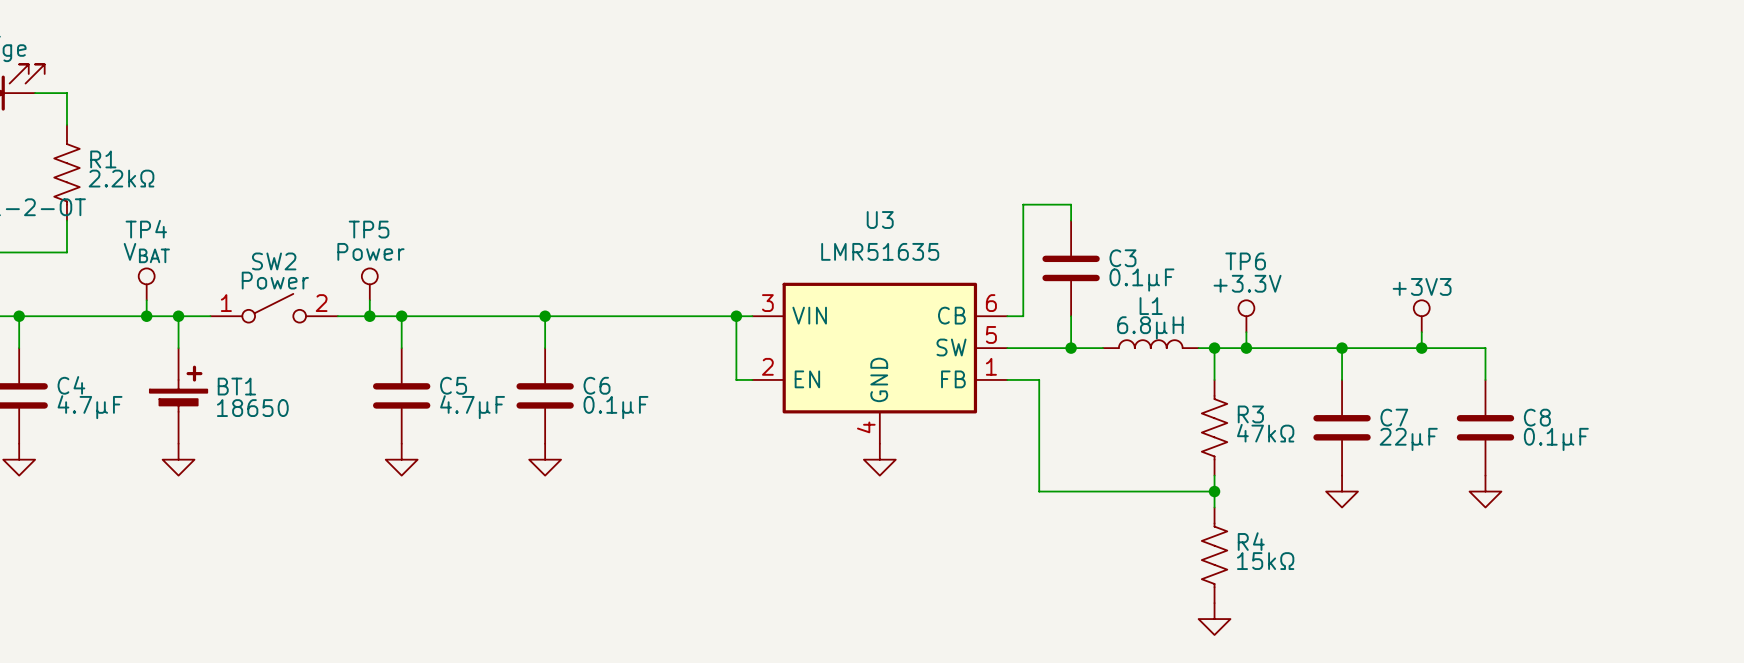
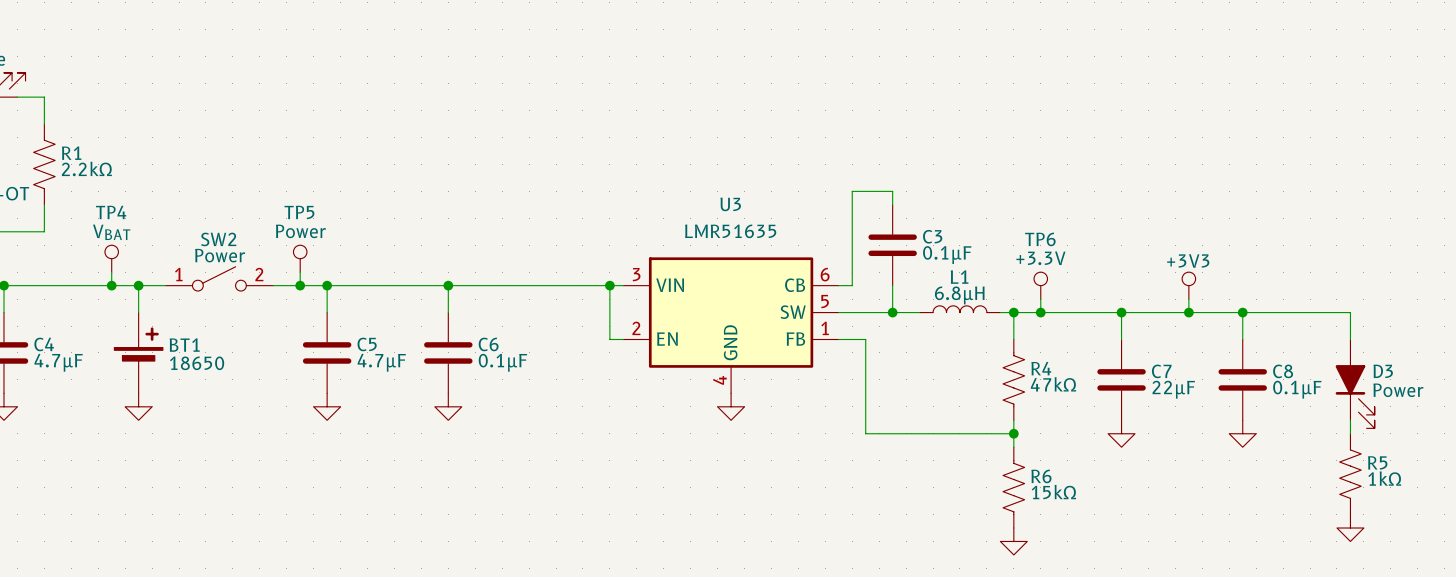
wire: none -> (1242, 312) (1350, 312) (1350, 339)
junction: none -> (1242, 312)
R3 name: R3 (1250, 414) -> R4 (1041, 368)
D3: none -> Power (1355, 383)
wire: none -> (1350, 420) (1350, 433)
R5: none -> 1kΩ (1350, 474)
R4 name: R4 (1251, 541) -> R6 (1041, 476)
power symbol: none -> (1350, 528)

